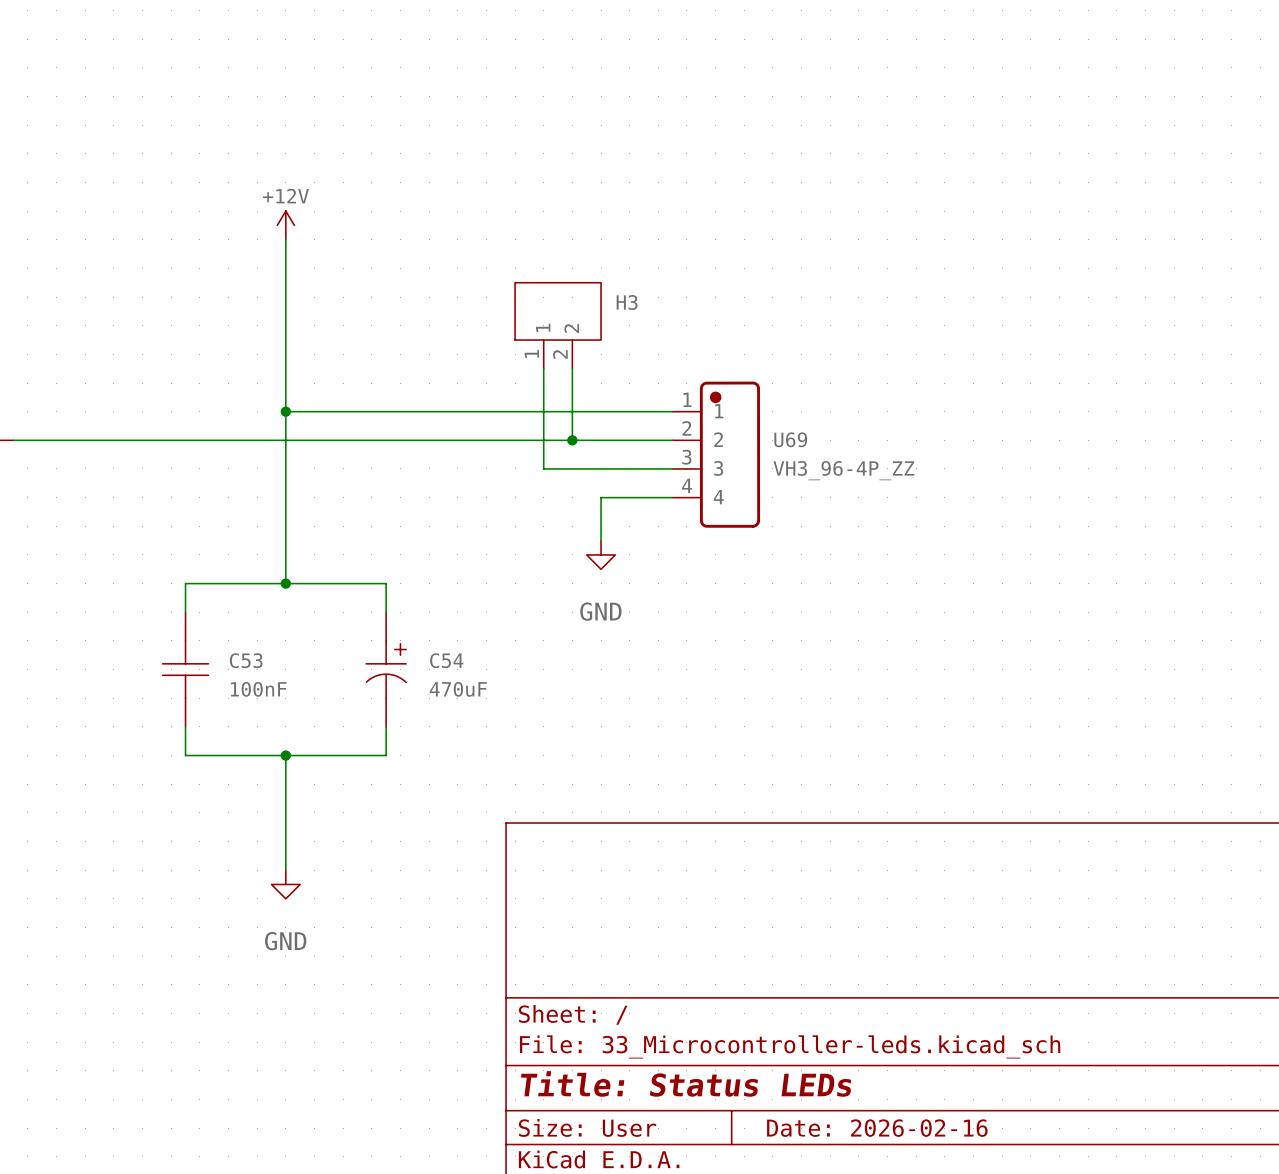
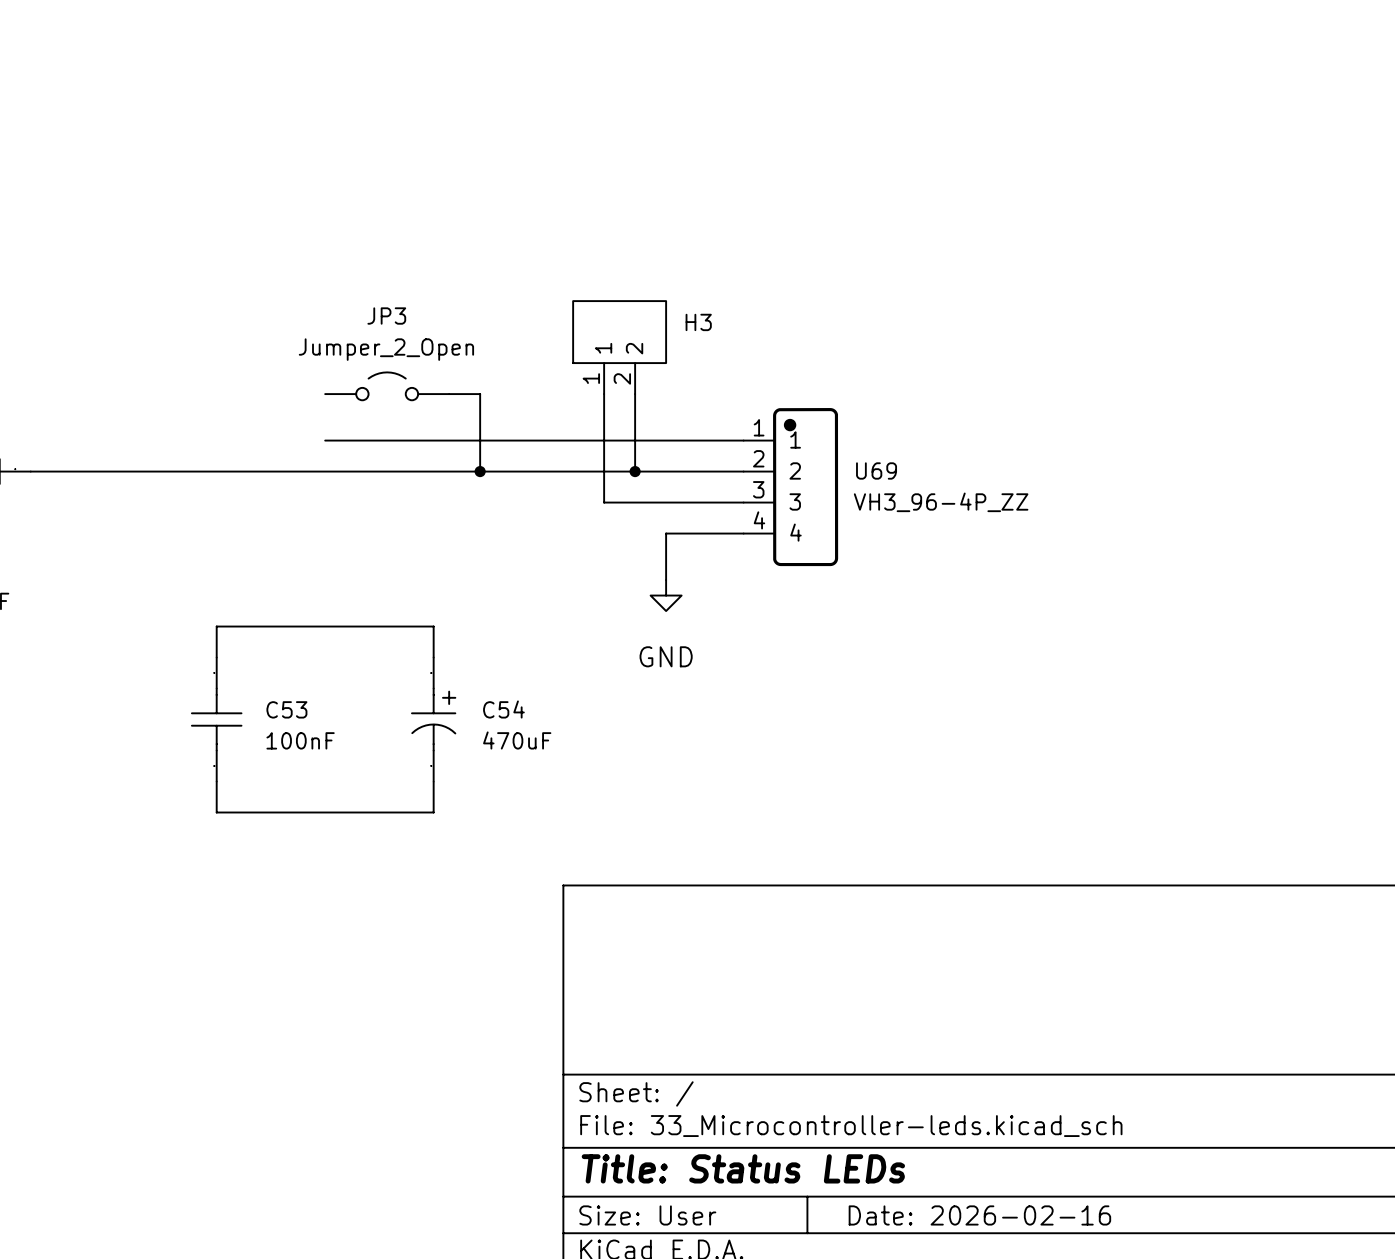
power symbol: +12V (285, 225) -> none
wire: (285, 239) (285, 583) -> none
JP3: none -> Jumper_2_Open (387, 386)
wire: none -> (449, 394) (480, 394) (480, 471)
junction: (285, 411) -> none
junction: none -> (480, 471)
junction: (285, 583) -> none
wire: (285, 755) (285, 870) -> none
junction: (285, 755) -> none
power symbol: GND (285, 884) -> none

